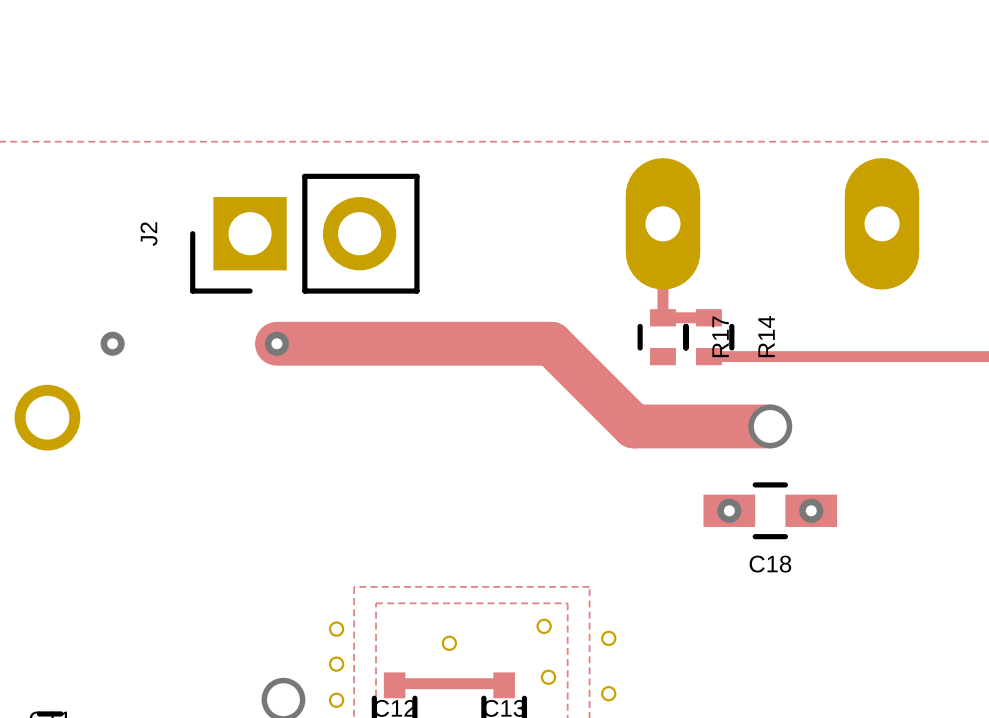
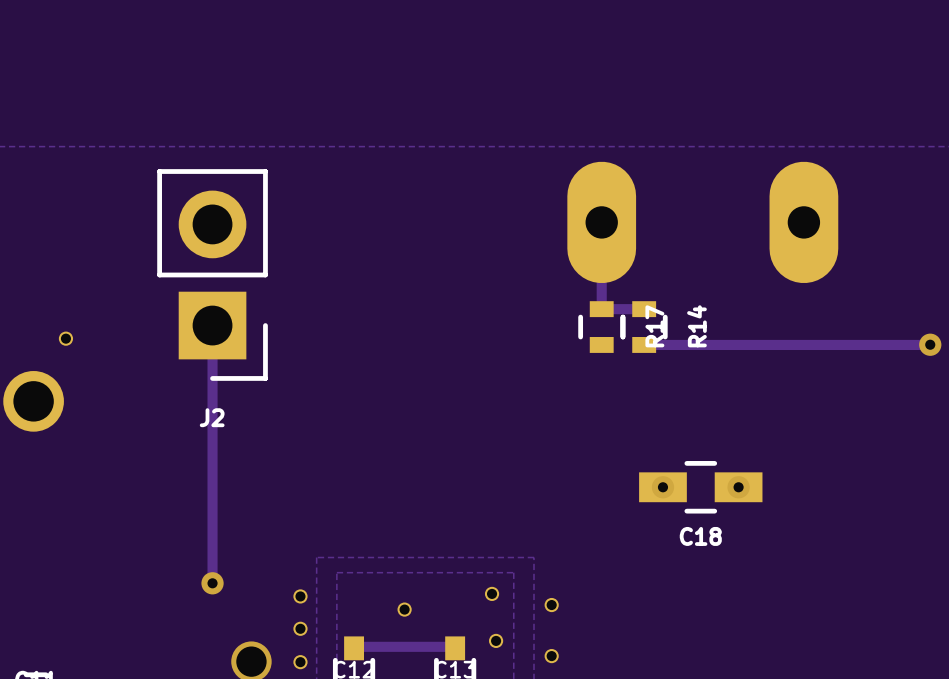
J2 rotation: 0° (304, 233) -> 90° counterclockwise (212, 274)
track: none -> (212, 325) (212, 583)
via: (112, 343) -> none
track: (276, 343) (551, 343) (633, 426) (770, 426) -> none
via: (276, 343) -> none
part: none -> (65, 338)
via: (770, 426) -> none
via: none -> (212, 583)

